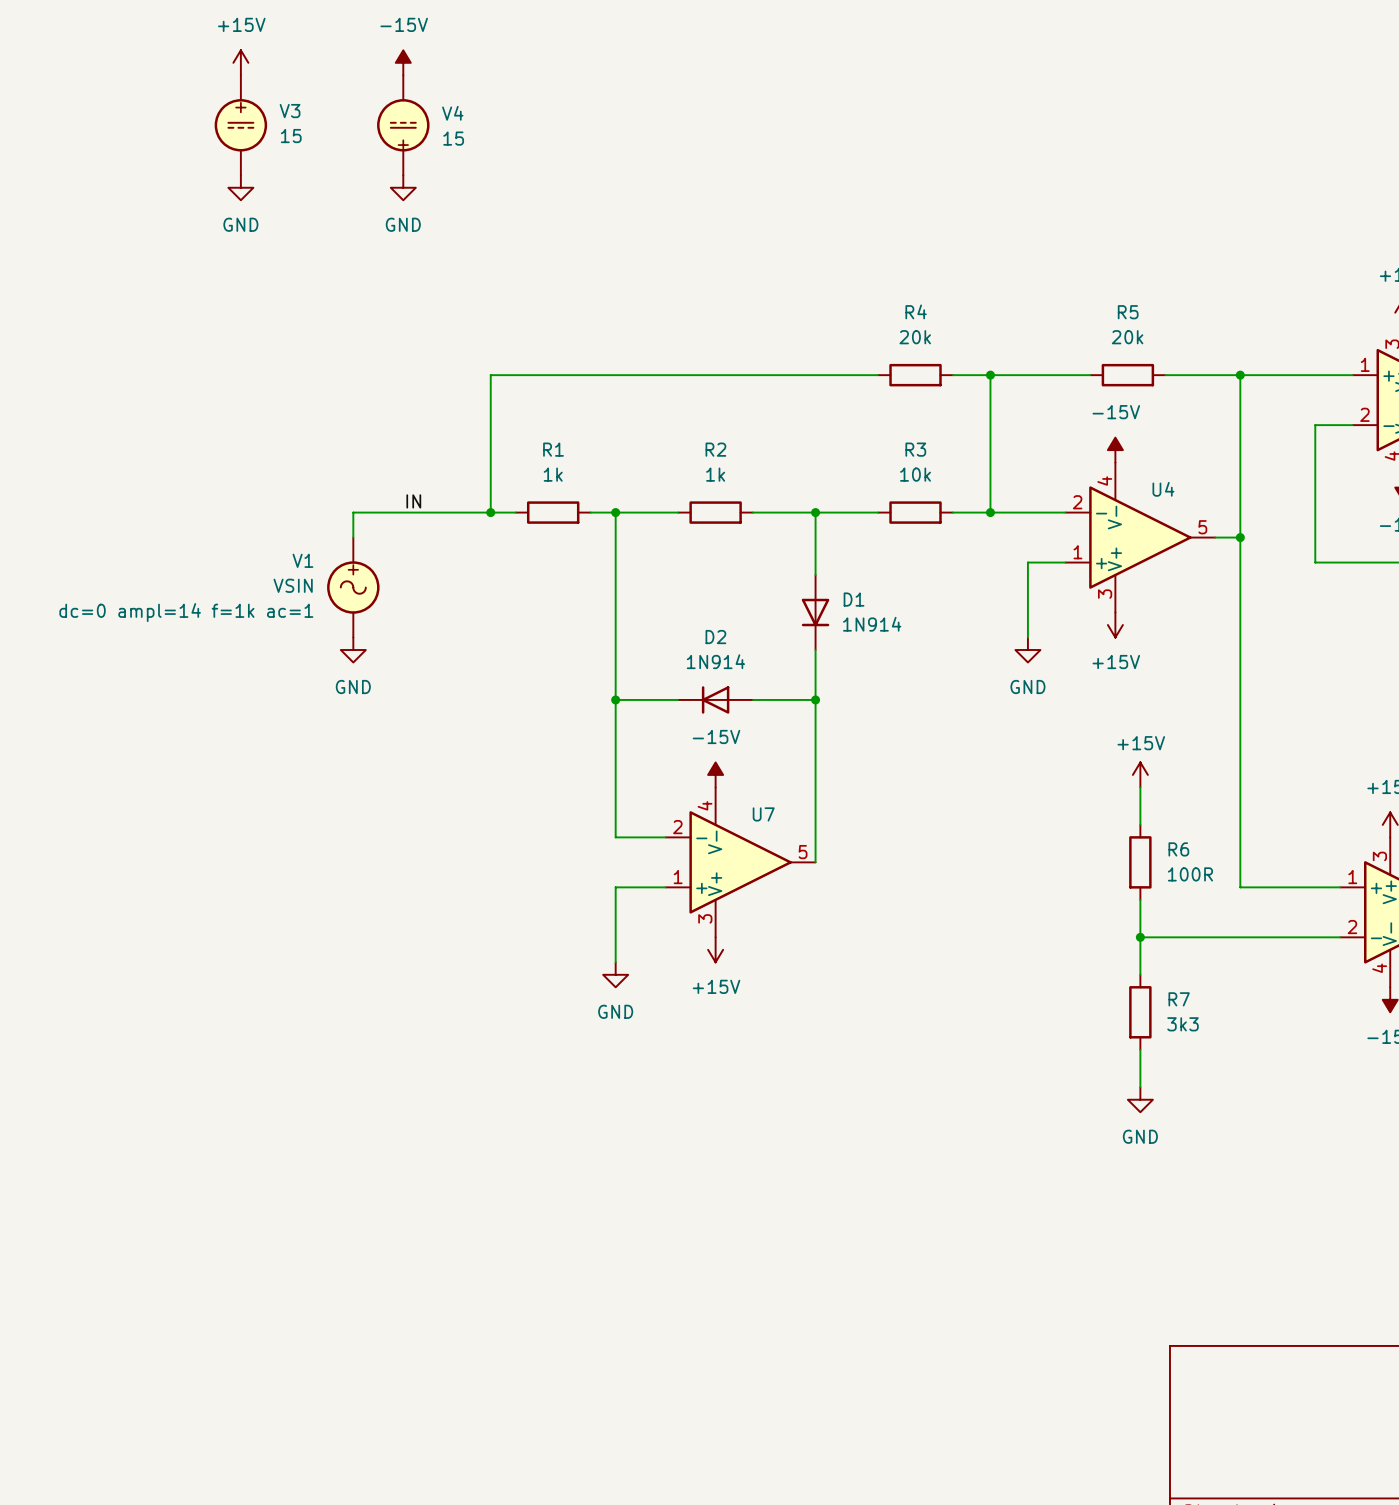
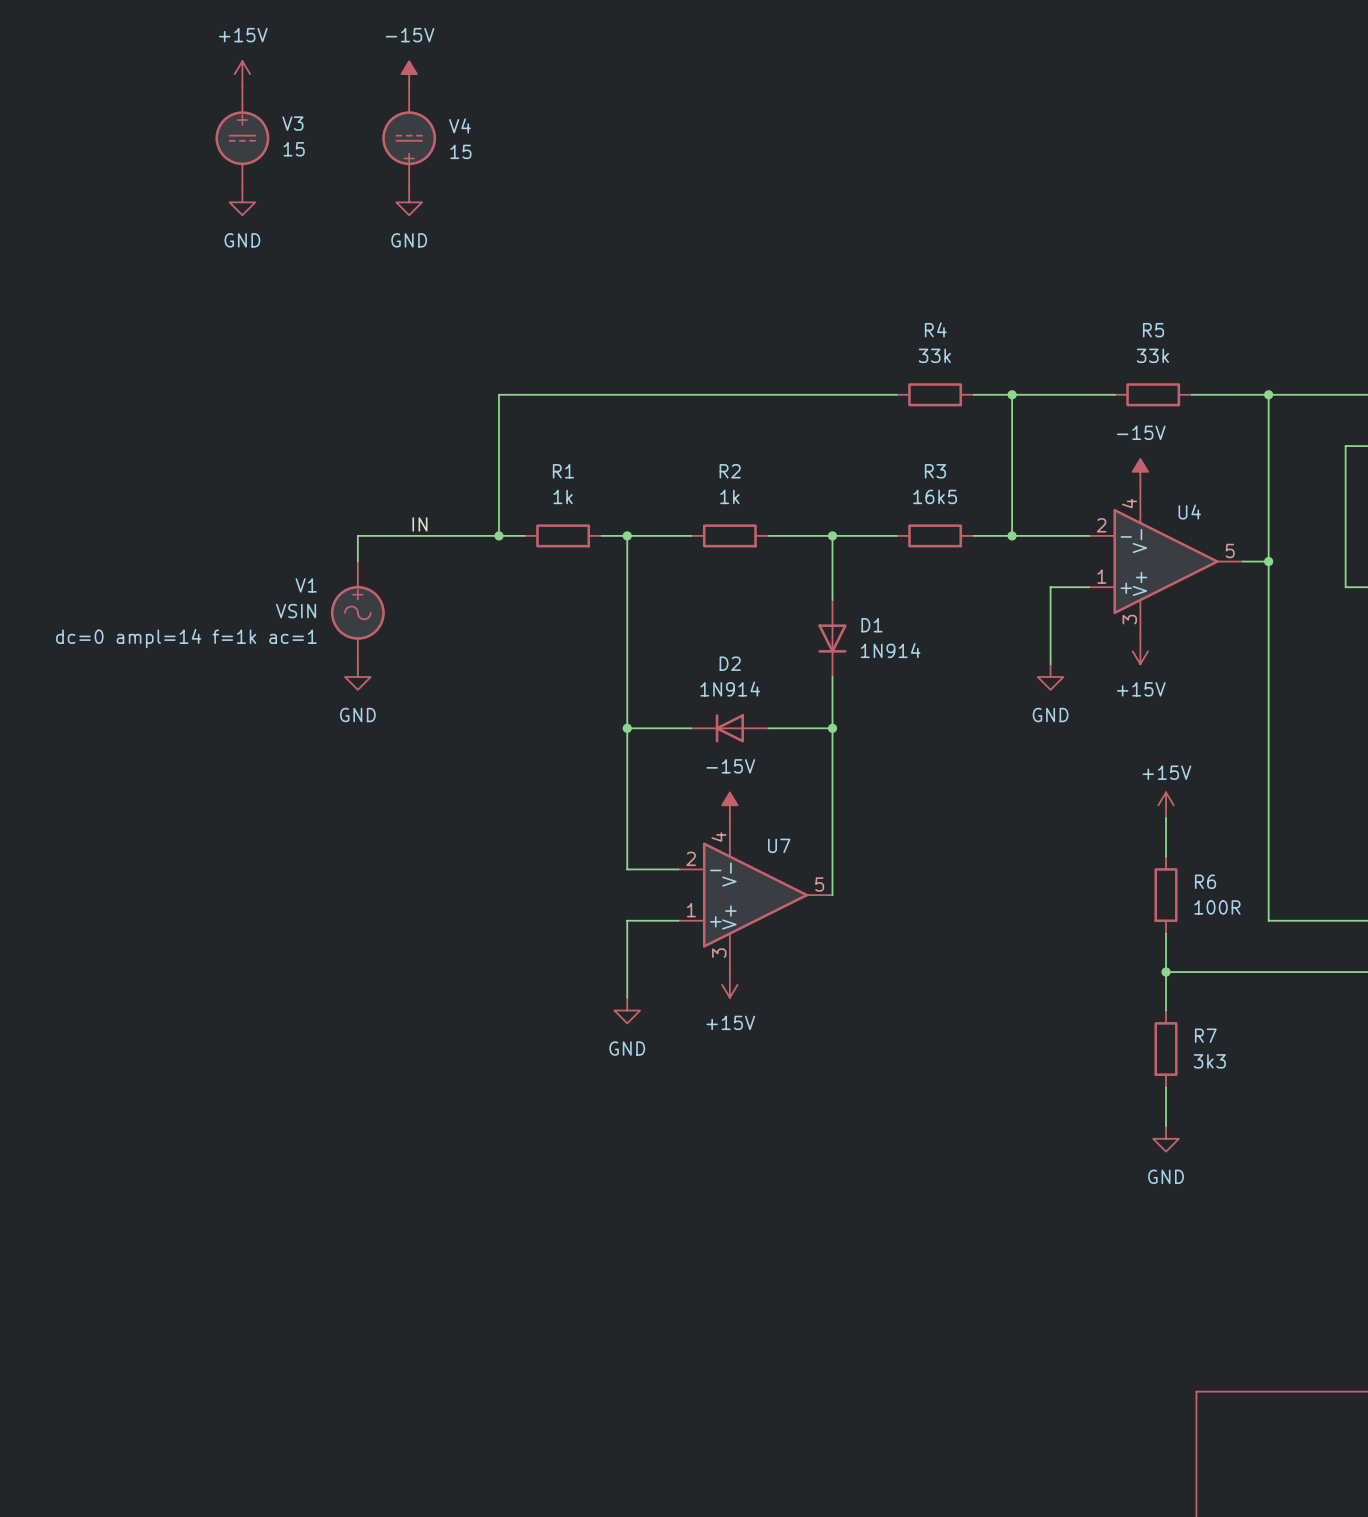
R4 value: 20k (915, 337) -> 33k (934, 355)
R5 value: 20k (1127, 337) -> 33k (1152, 355)
R3 value: 10k (915, 474) -> 16k5 (935, 496)

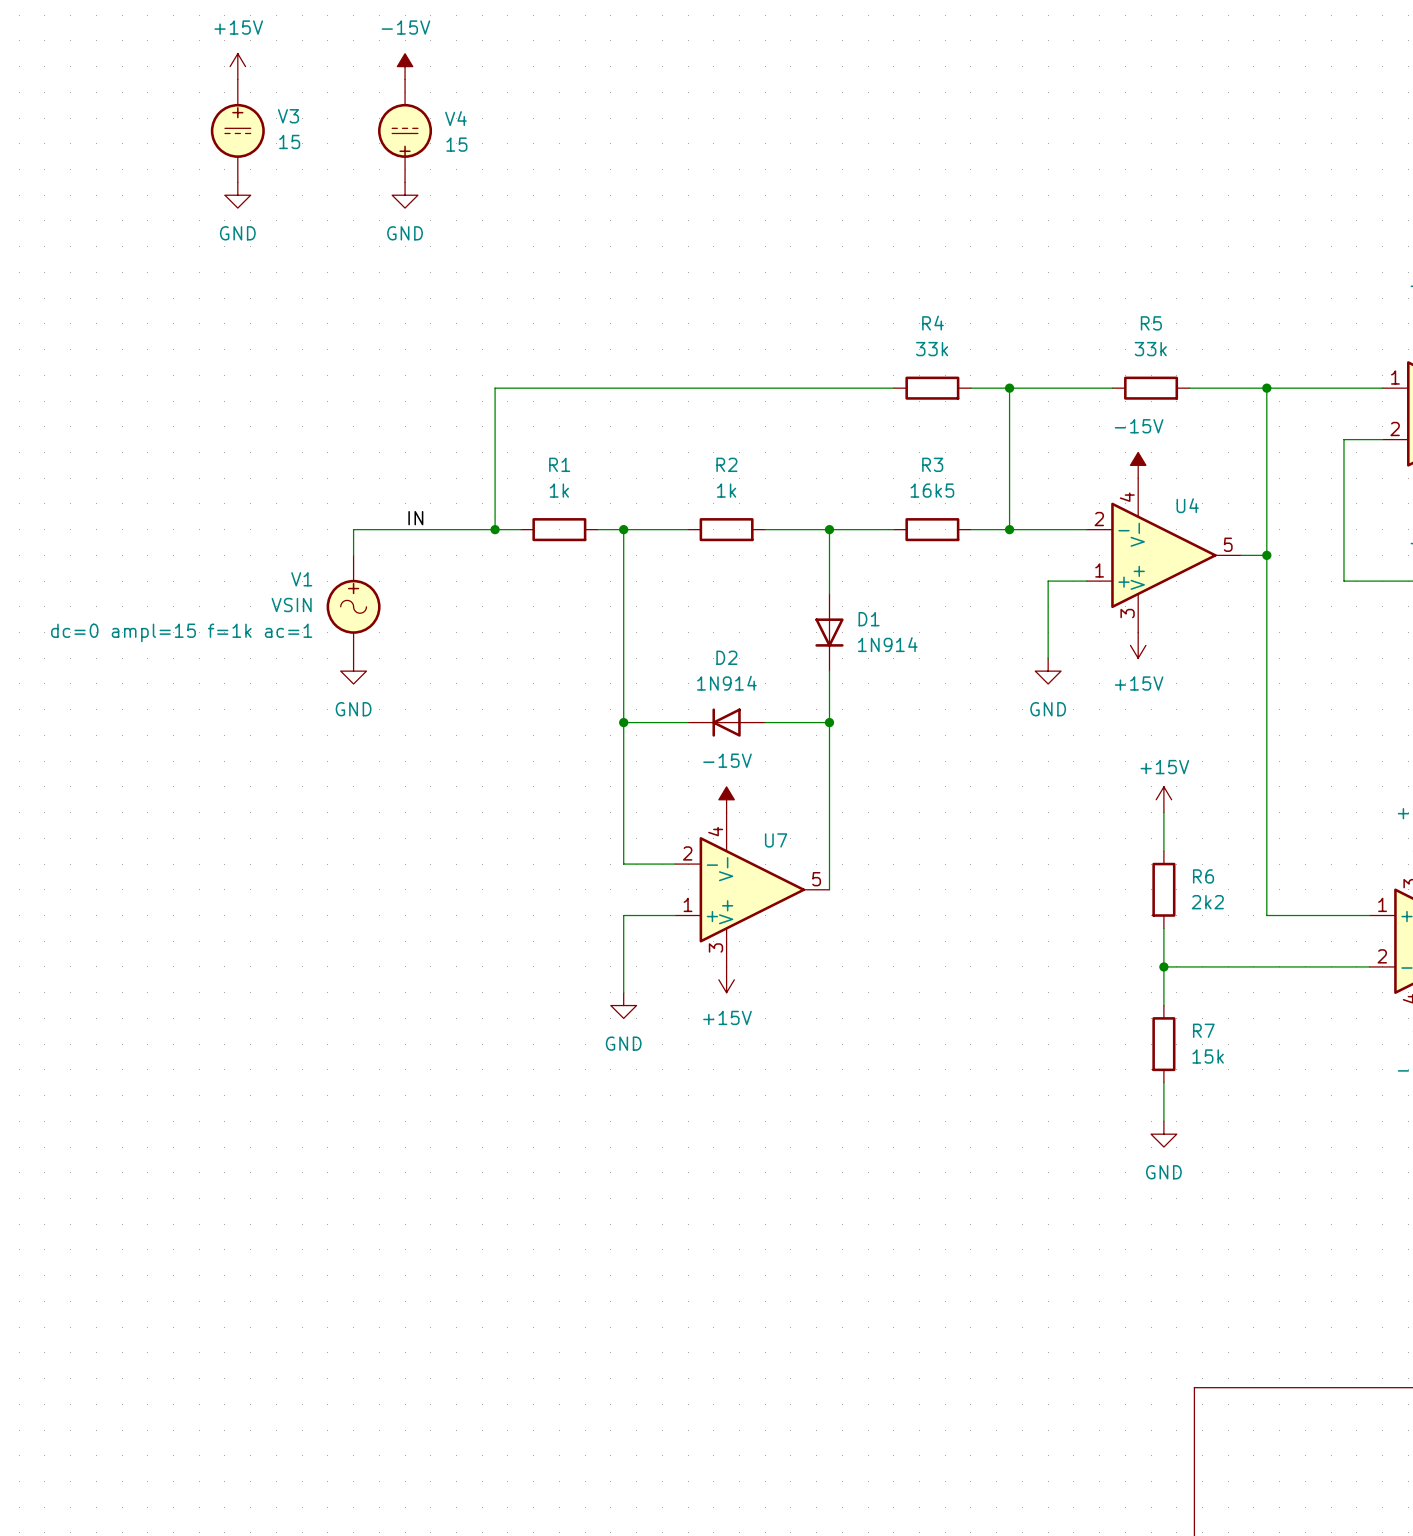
V1 text: dc=0 ampl=14 f=1k ac=1 (186, 638) -> dc=0 ampl=15 f=1k ac=1 (181, 632)
R6 value: 100R (1217, 907) -> 2k2 (1207, 902)
R7 value: 3k3 (1209, 1061) -> 15k (1208, 1056)

